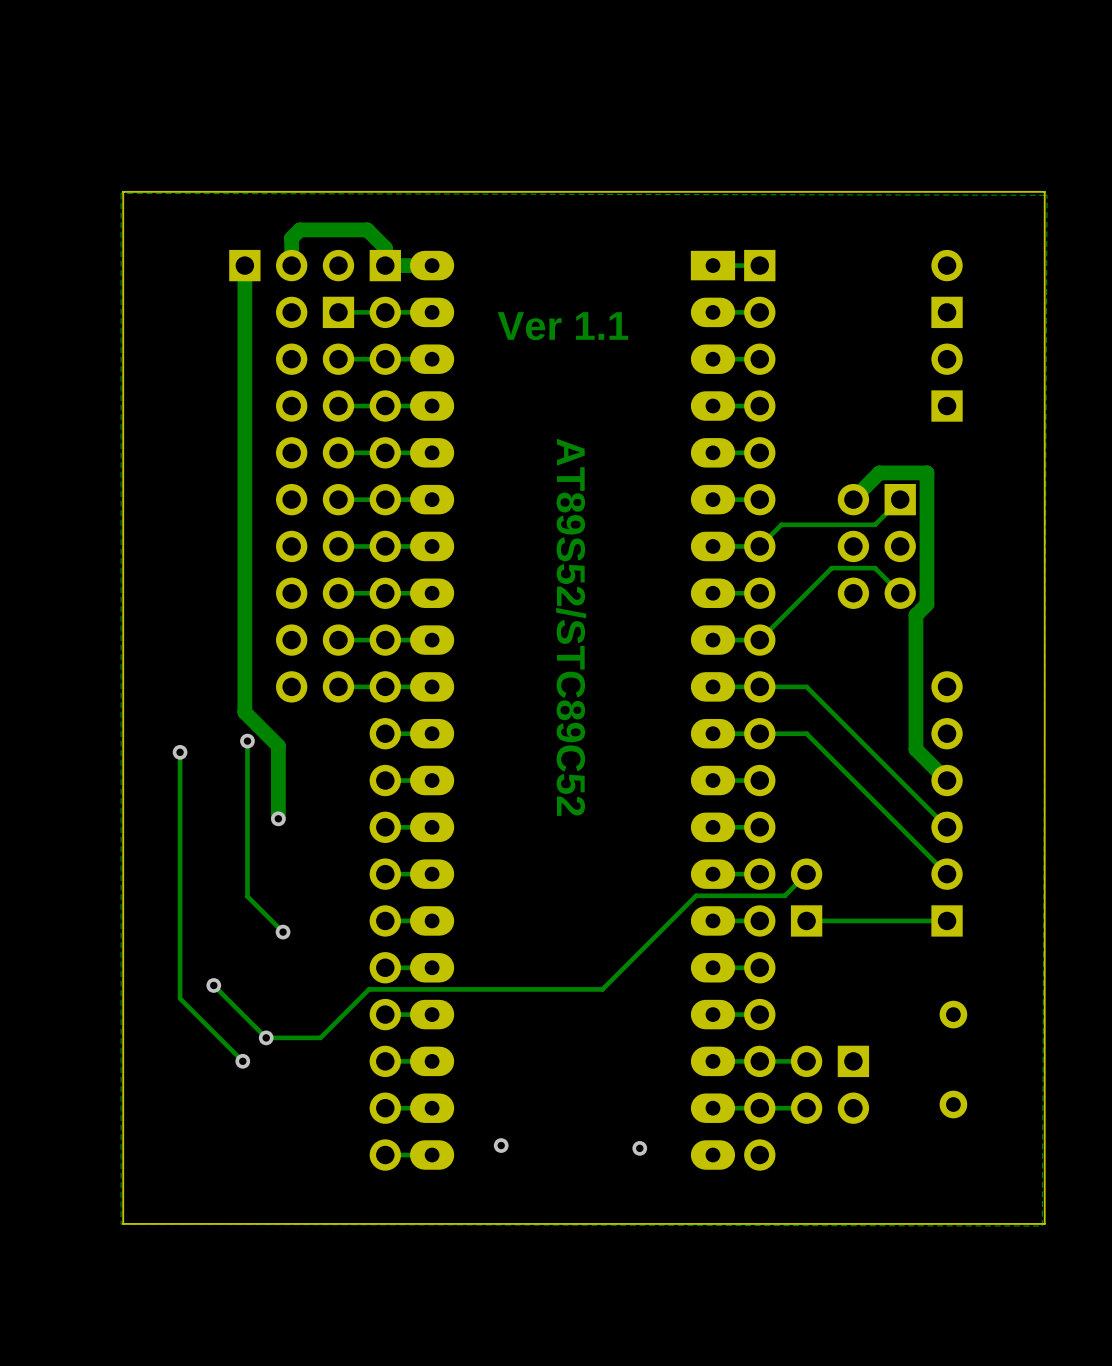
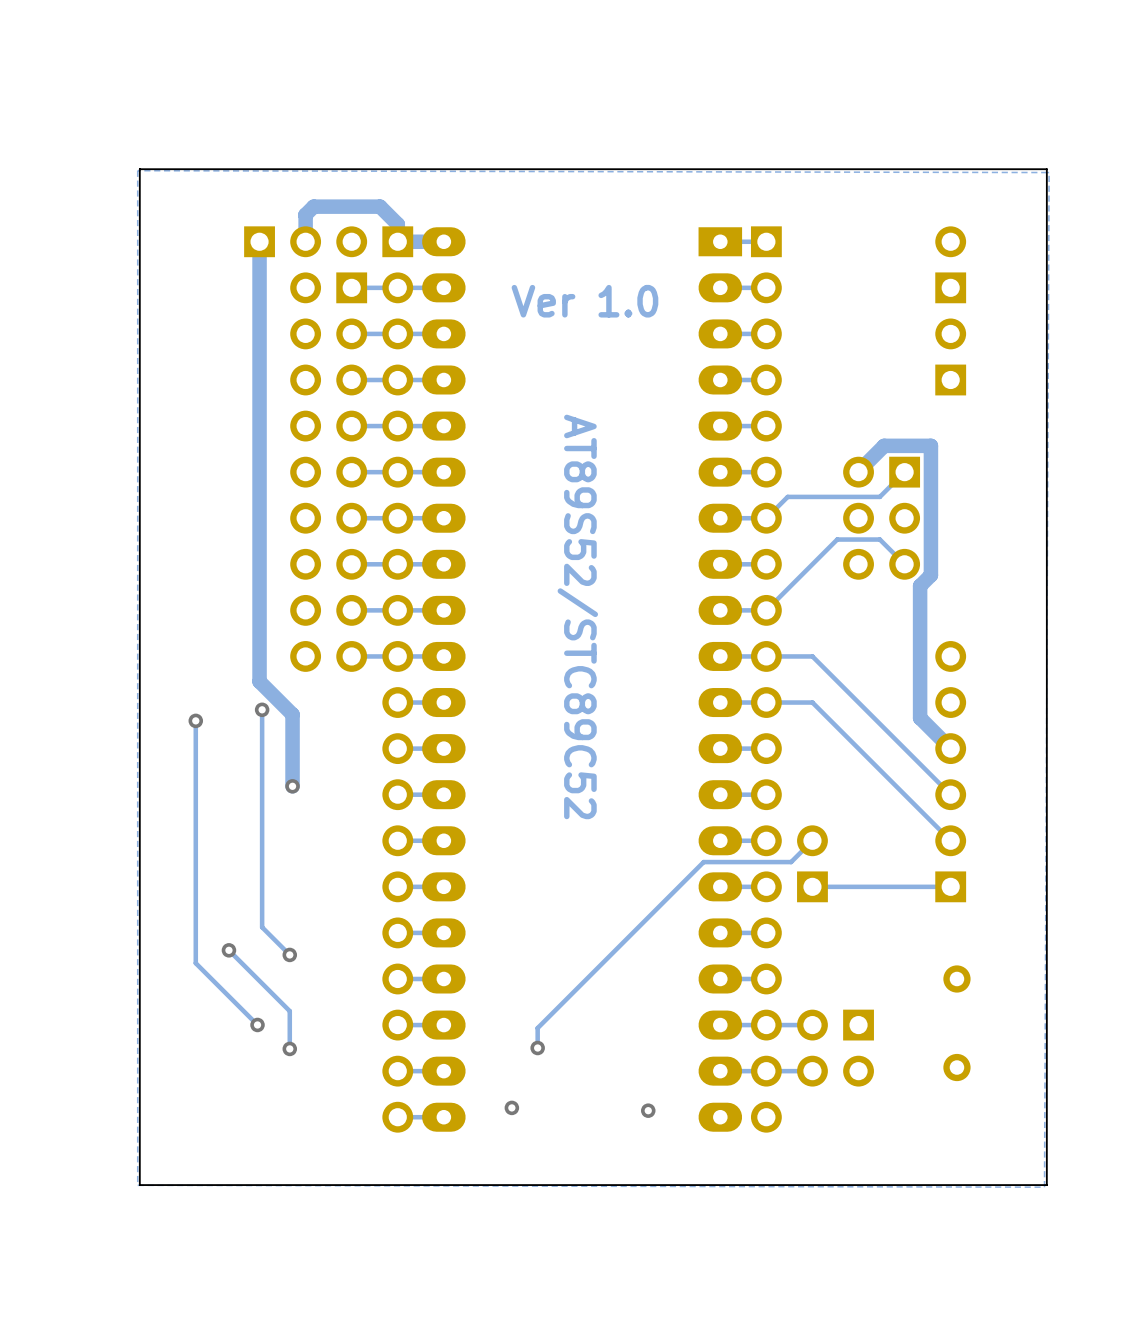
text: Ver 1.1 (562, 326) -> Ver 1.0 (584, 301)
track: (247, 896) (283, 932) -> (262, 862) (262, 927) (289, 954)
via: (283, 932) -> none
track: (602, 989) (368, 989) (320, 1037) (266, 1037) -> (611, 954) (537, 1028) (537, 1048)
via: none -> (289, 954)
track: none -> (280, 1001) (289, 1011) (289, 1048)
via: (266, 1037) -> none
via: none -> (537, 1048)
via: none -> (289, 1048)

